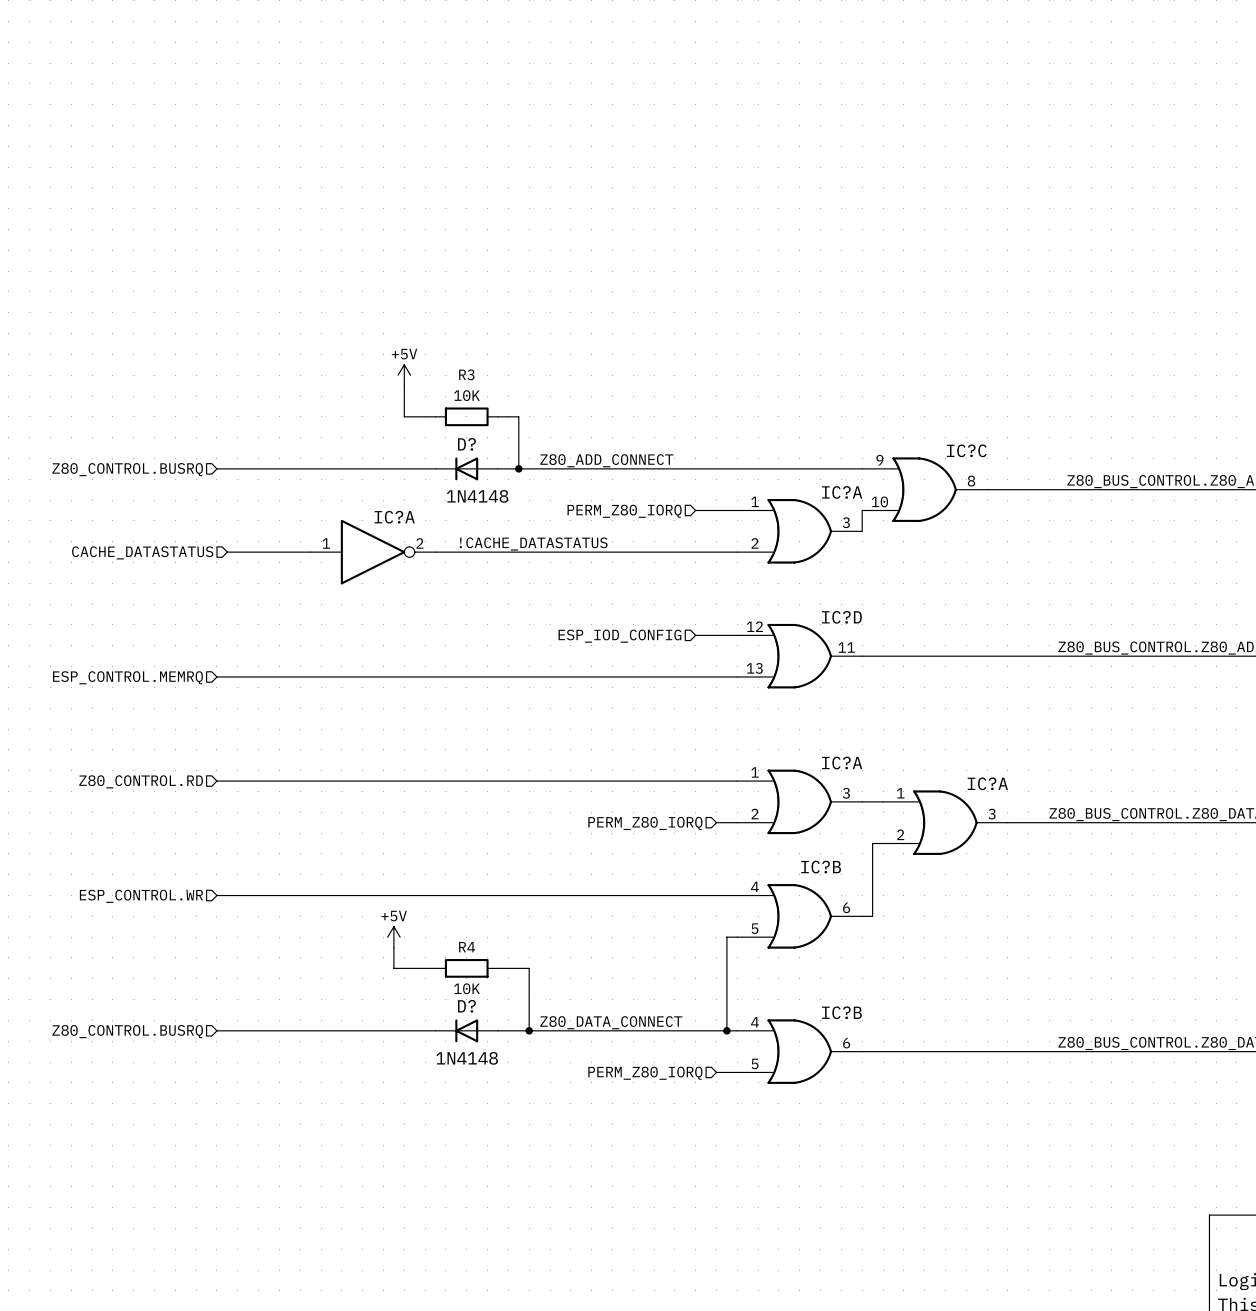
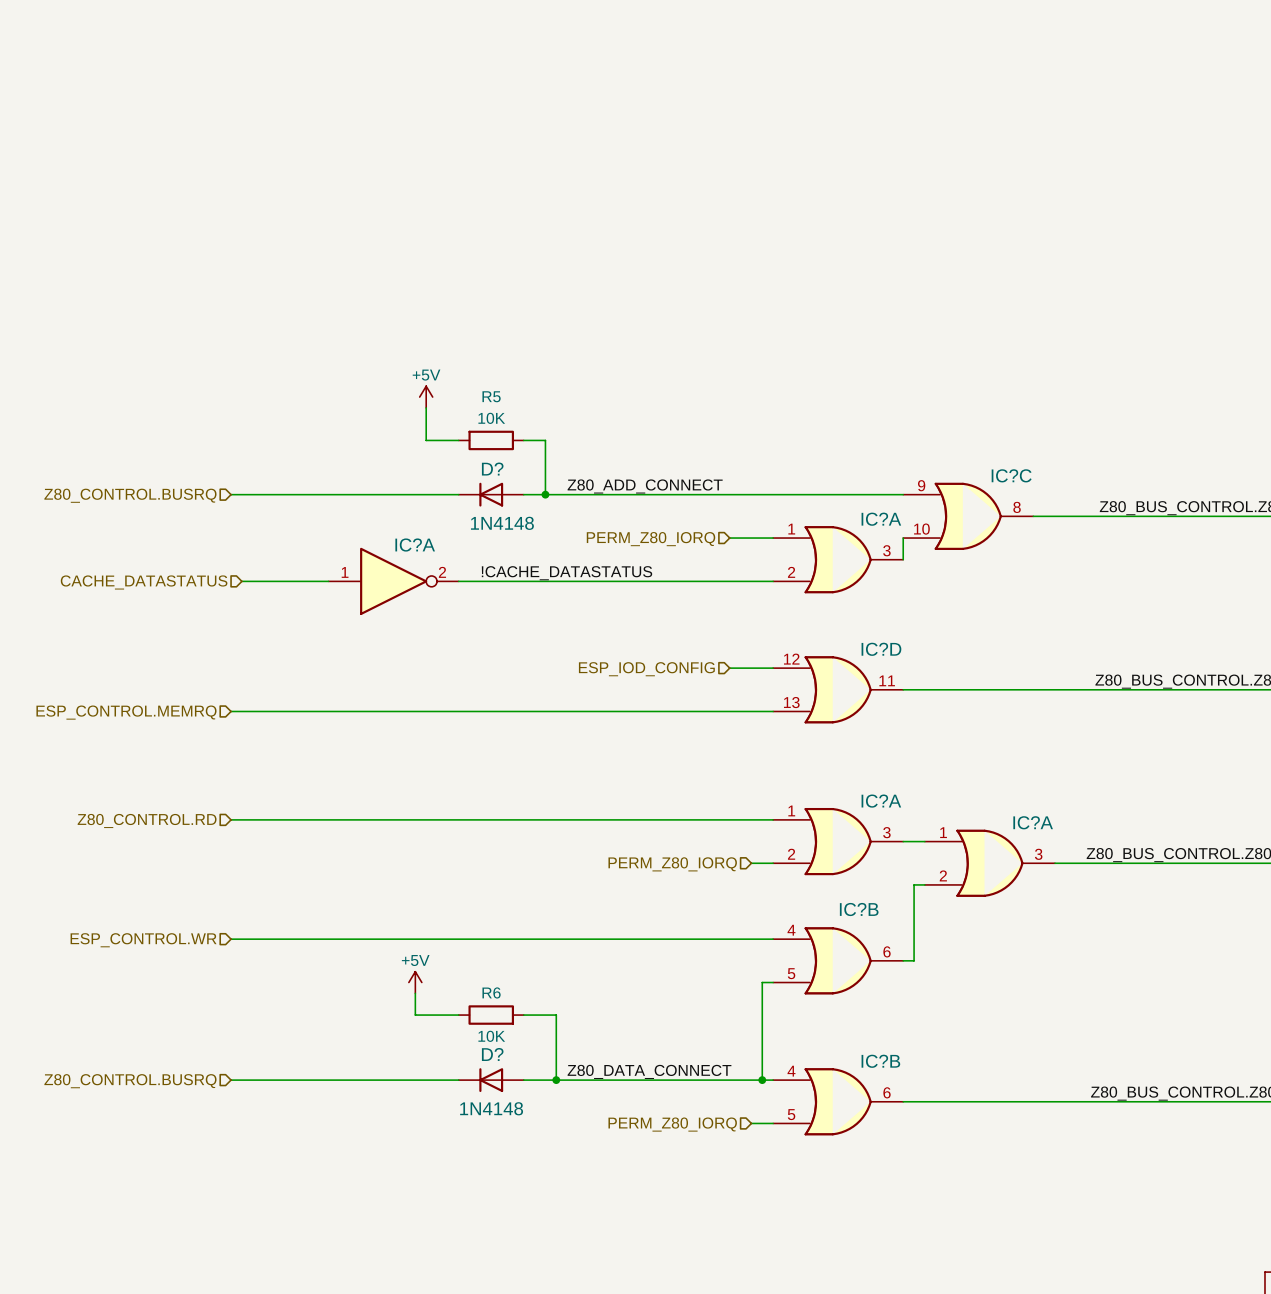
R3 name: R3 (466, 374) -> R5 (491, 396)
R4 name: R4 (467, 947) -> R6 (491, 992)

